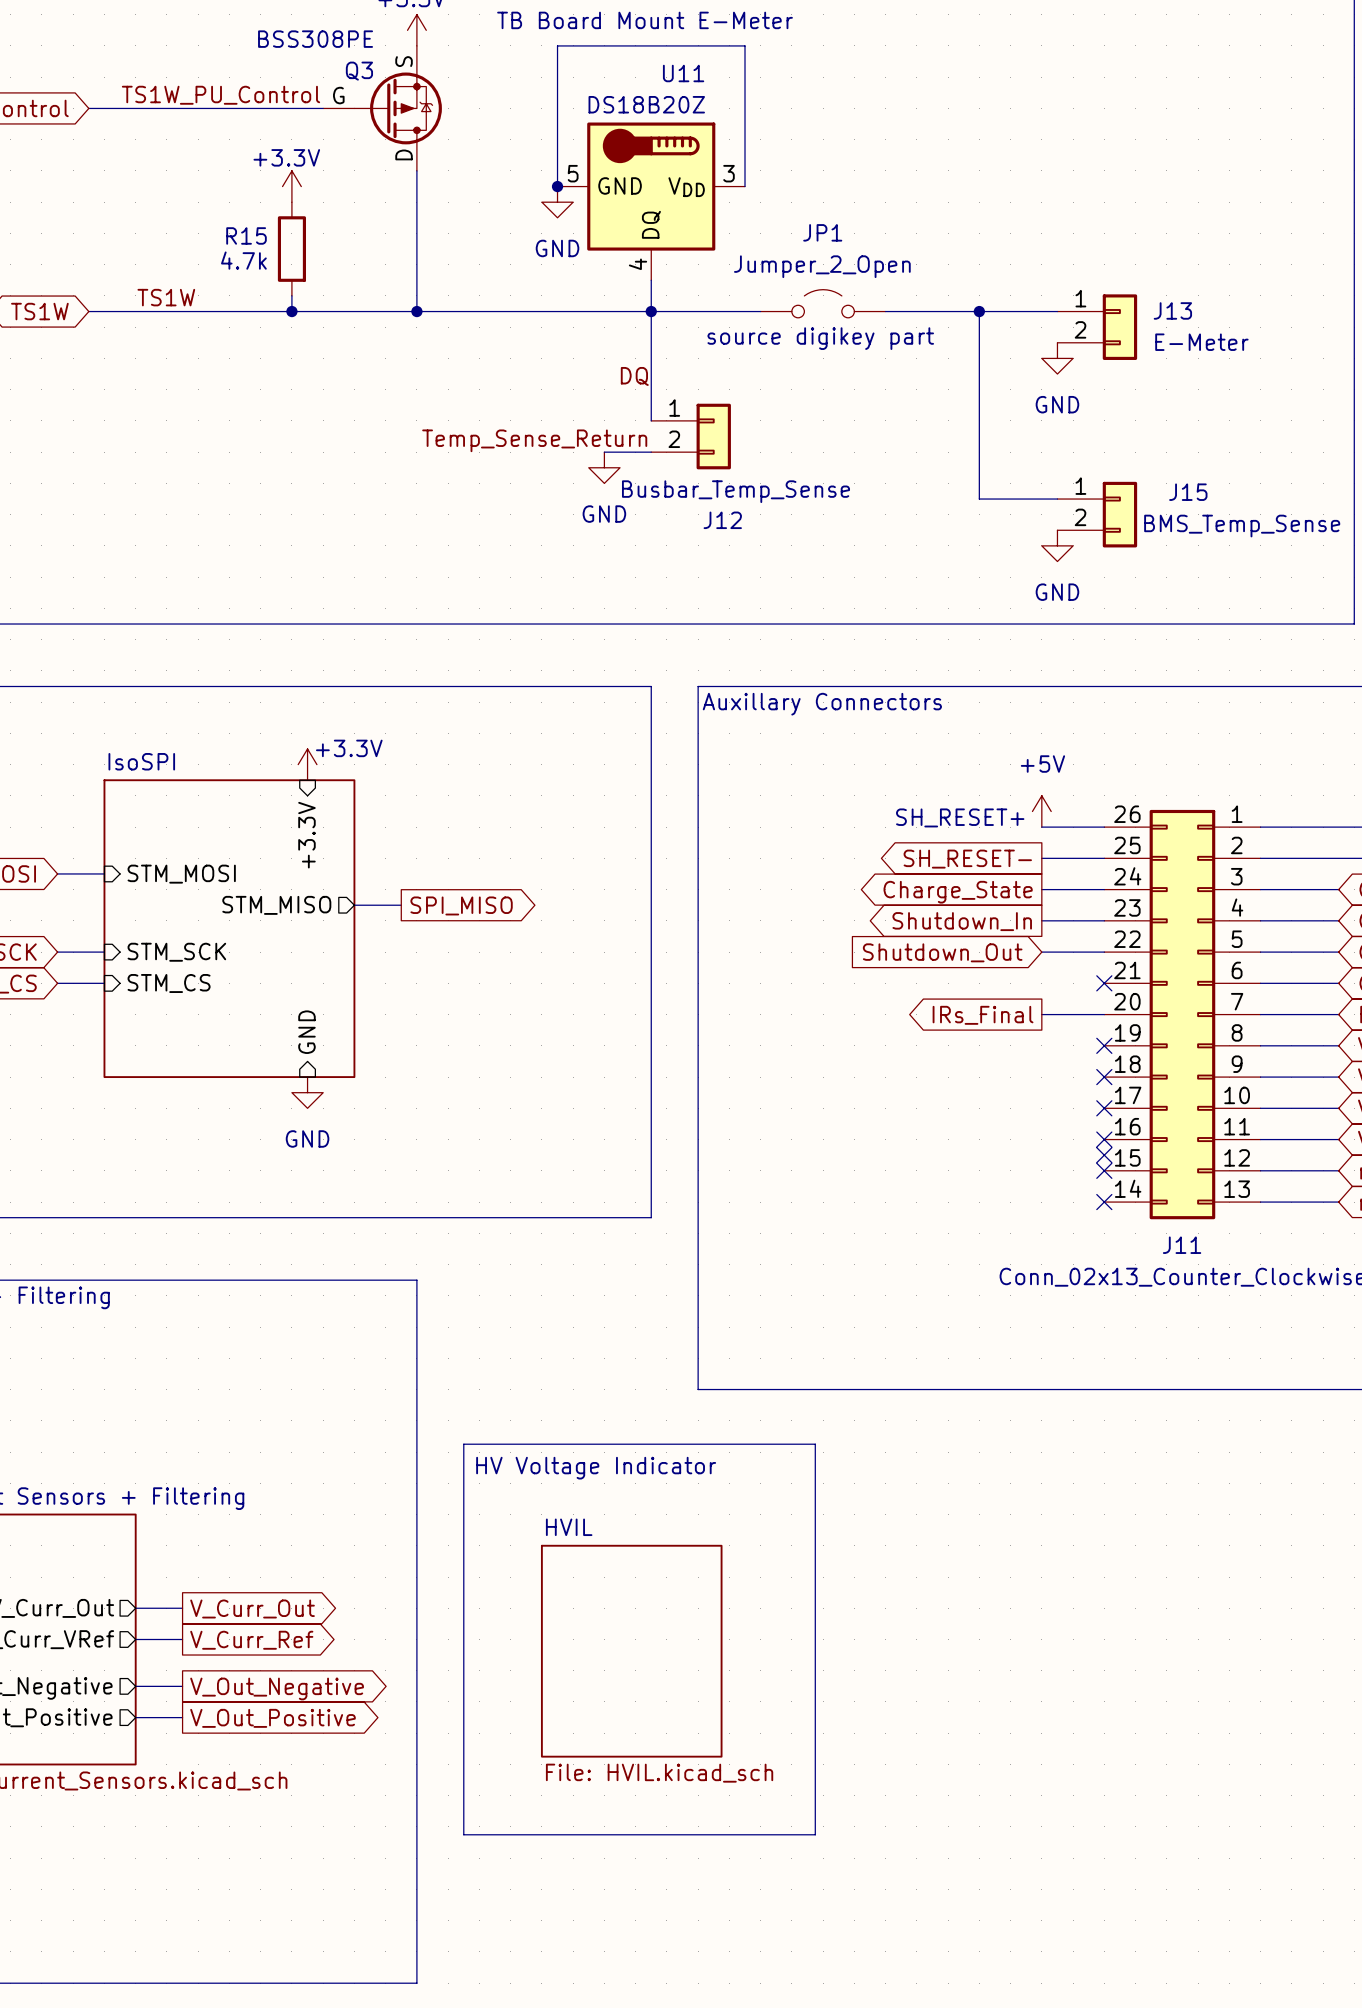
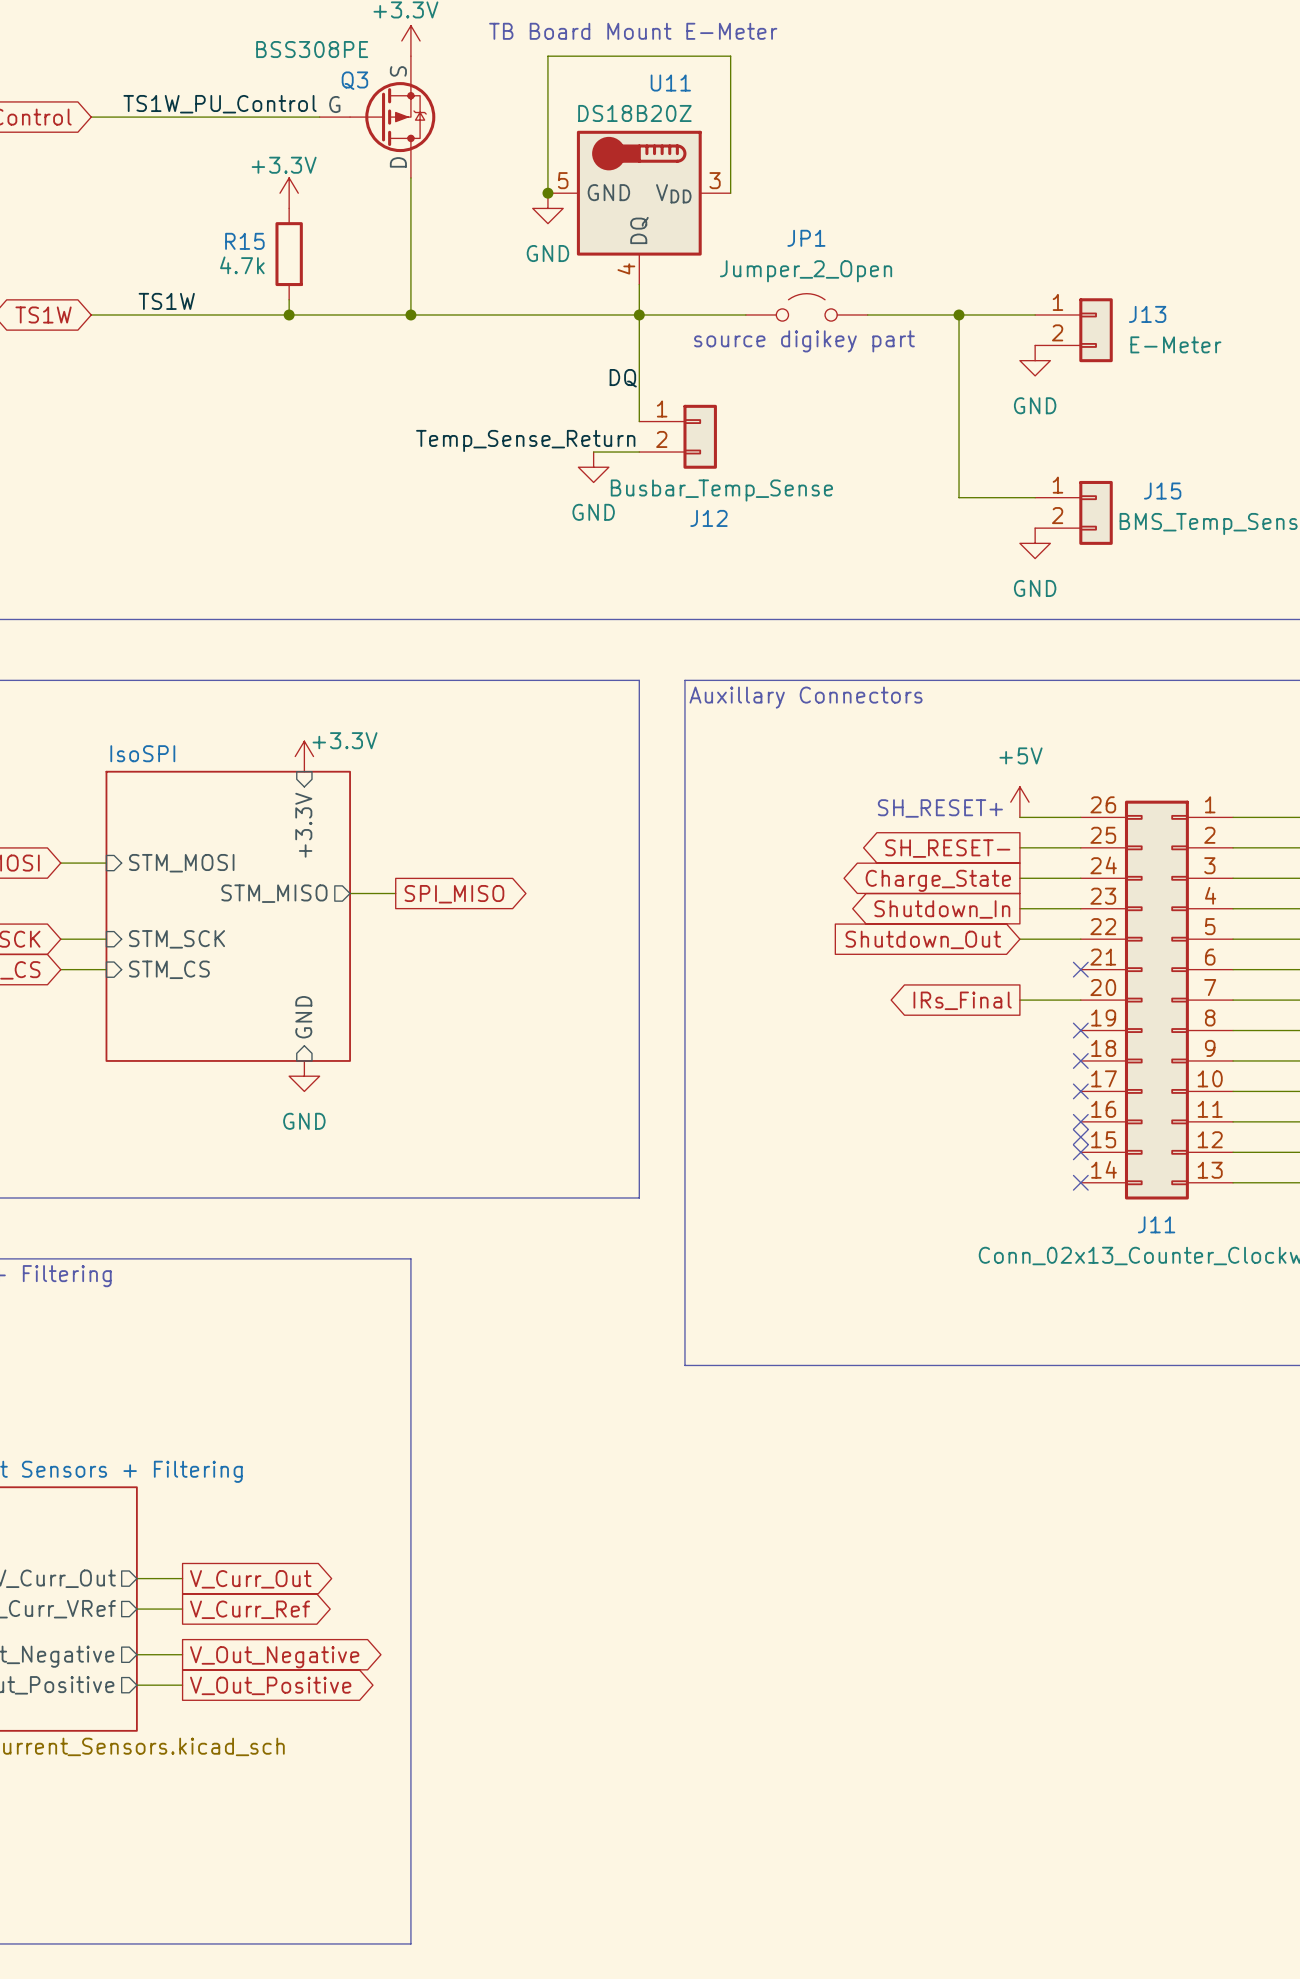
line: (463, 1444) (815, 1444) (815, 1834) (463, 1834) (463, 1444) -> none
text: HV Voltage Indicator (596, 1468) -> none
sheet HVIL: File: HVIL.kicad_sch (631, 1651) -> none

